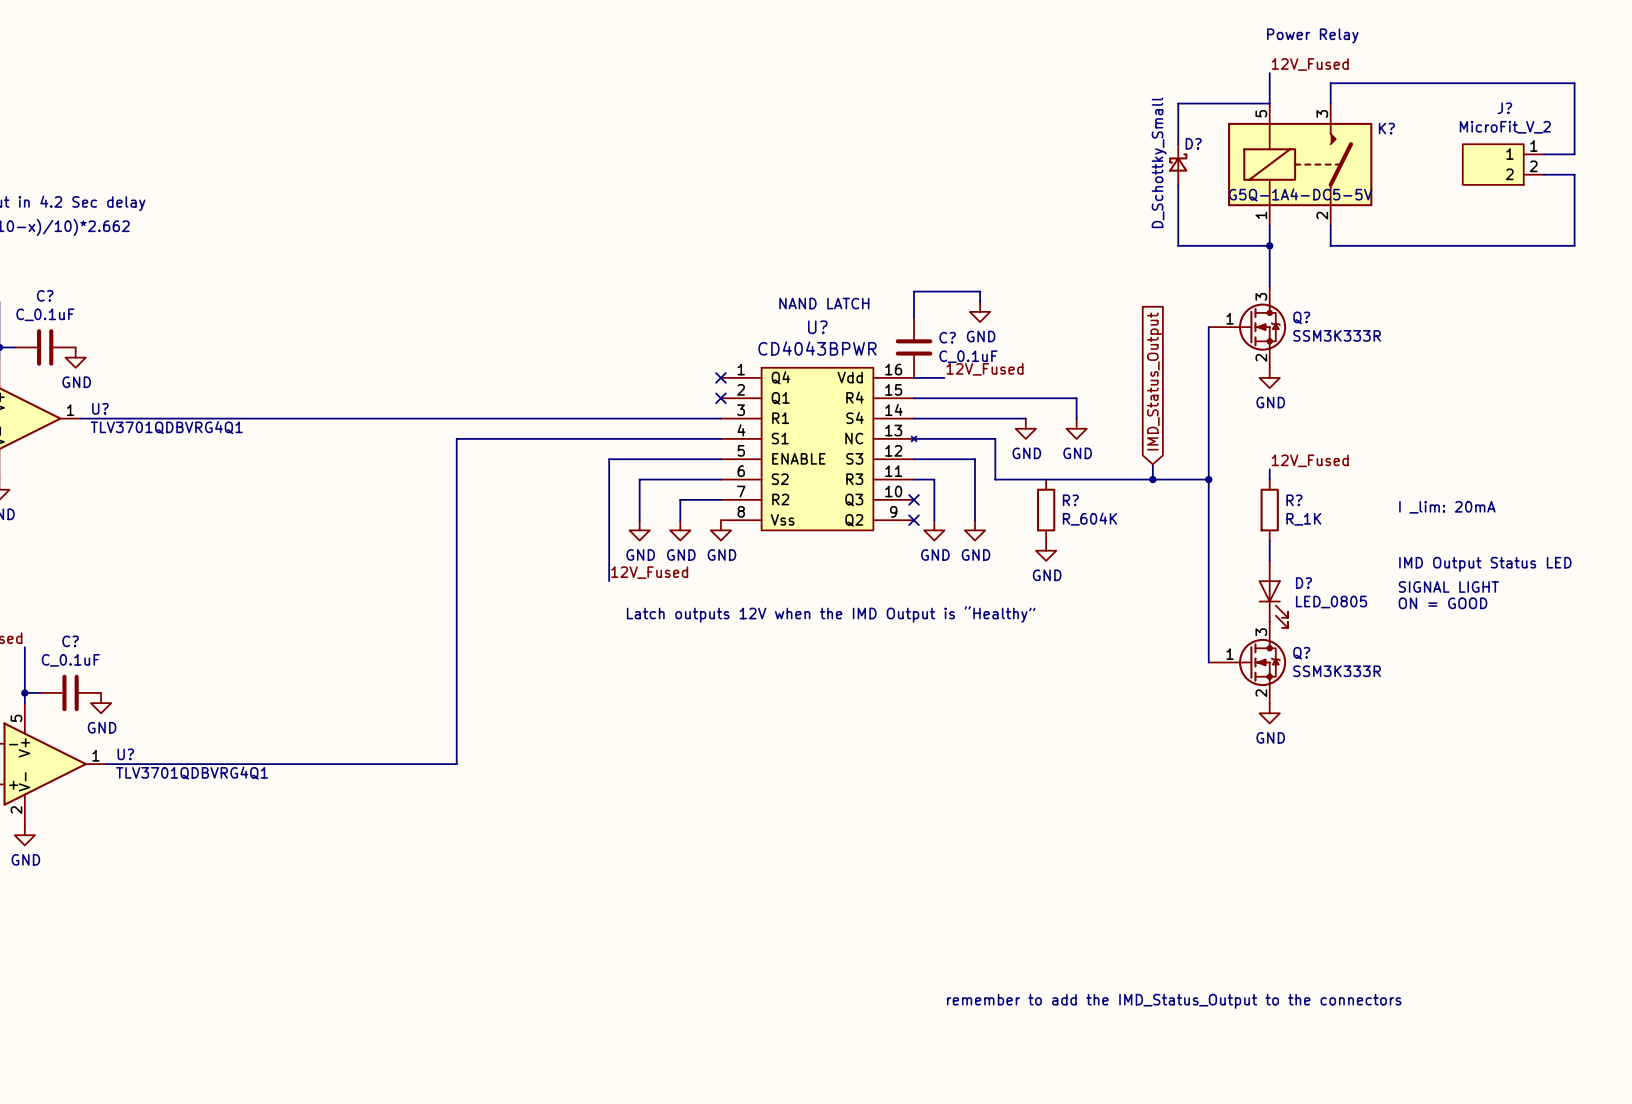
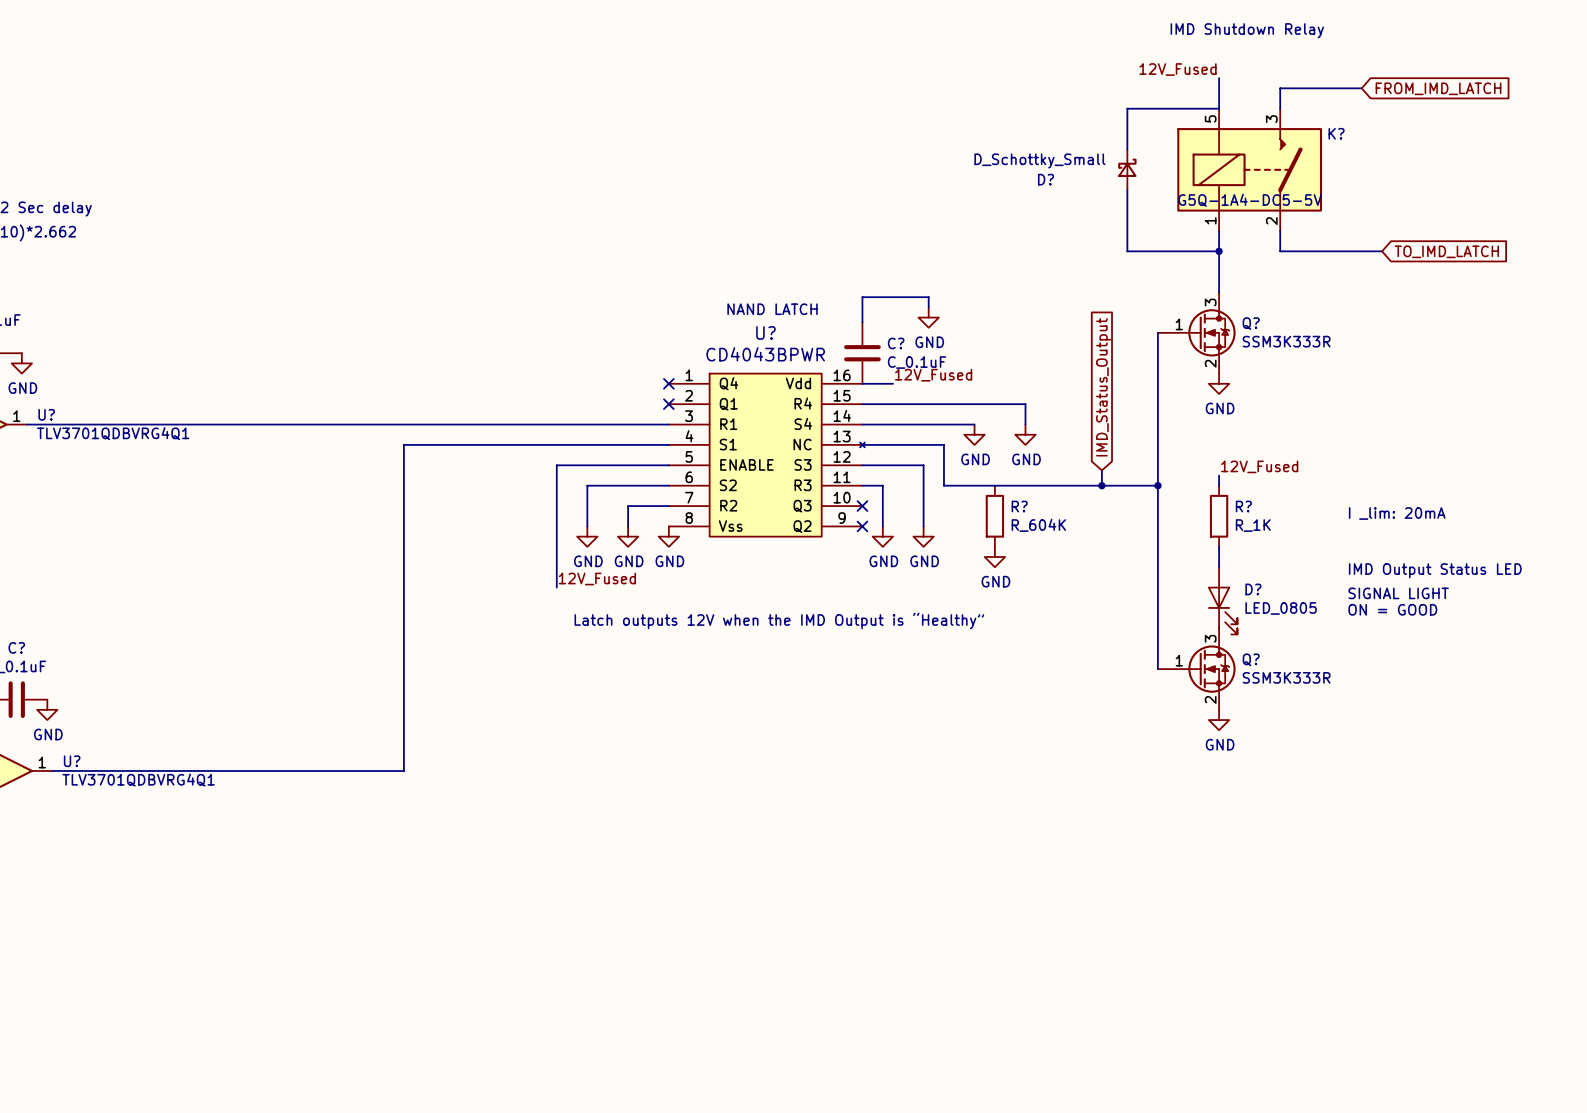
text: none -> IMD Shutdown Relay (1247, 30)
text: Power Relay (1312, 35) -> none
label position: 12V_Fused (1310, 64) -> 12V_Fused (1177, 69)
wire: (1411, 83) (1574, 83) (1574, 154) (1544, 154) -> none
global label: none -> FROM_IMD_LATCH (1438, 88)
D? name position: D? (1193, 143) -> D? (1046, 179)
D? value rotation: 0° (1159, 162) -> 90° clockwise (1039, 160)
J?: MicroFit_V_2 (1503, 164) -> none
wire: (1544, 174) (1574, 174) (1574, 245) (1432, 245) -> none
global label: none -> TO_IMD_LATCH (1446, 251)
text: remember to add the IMD_Status_Output to the connectors (1174, 1001) -> none

